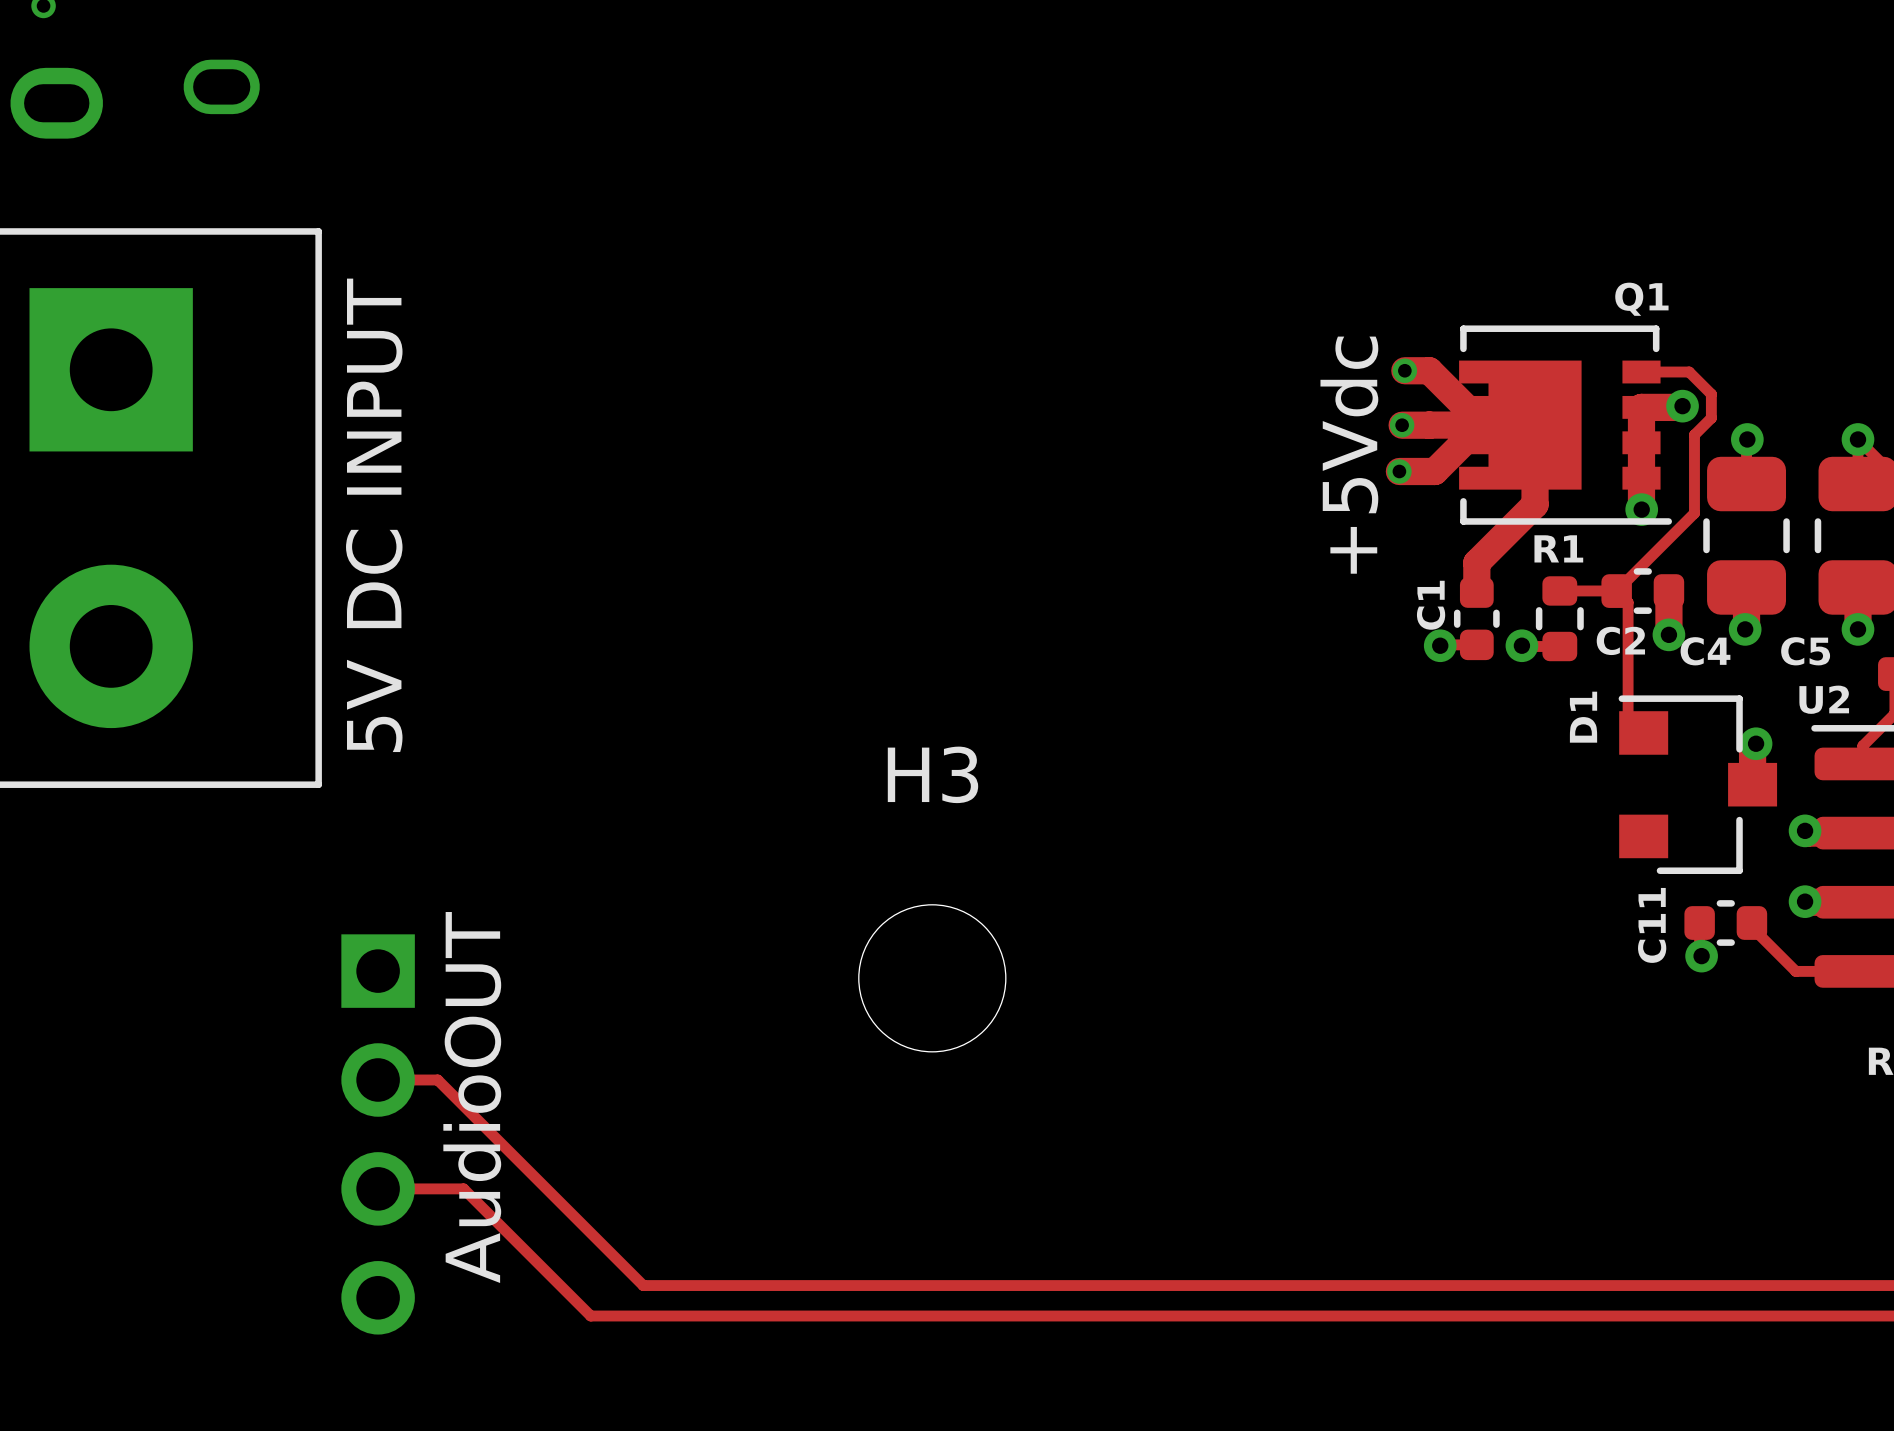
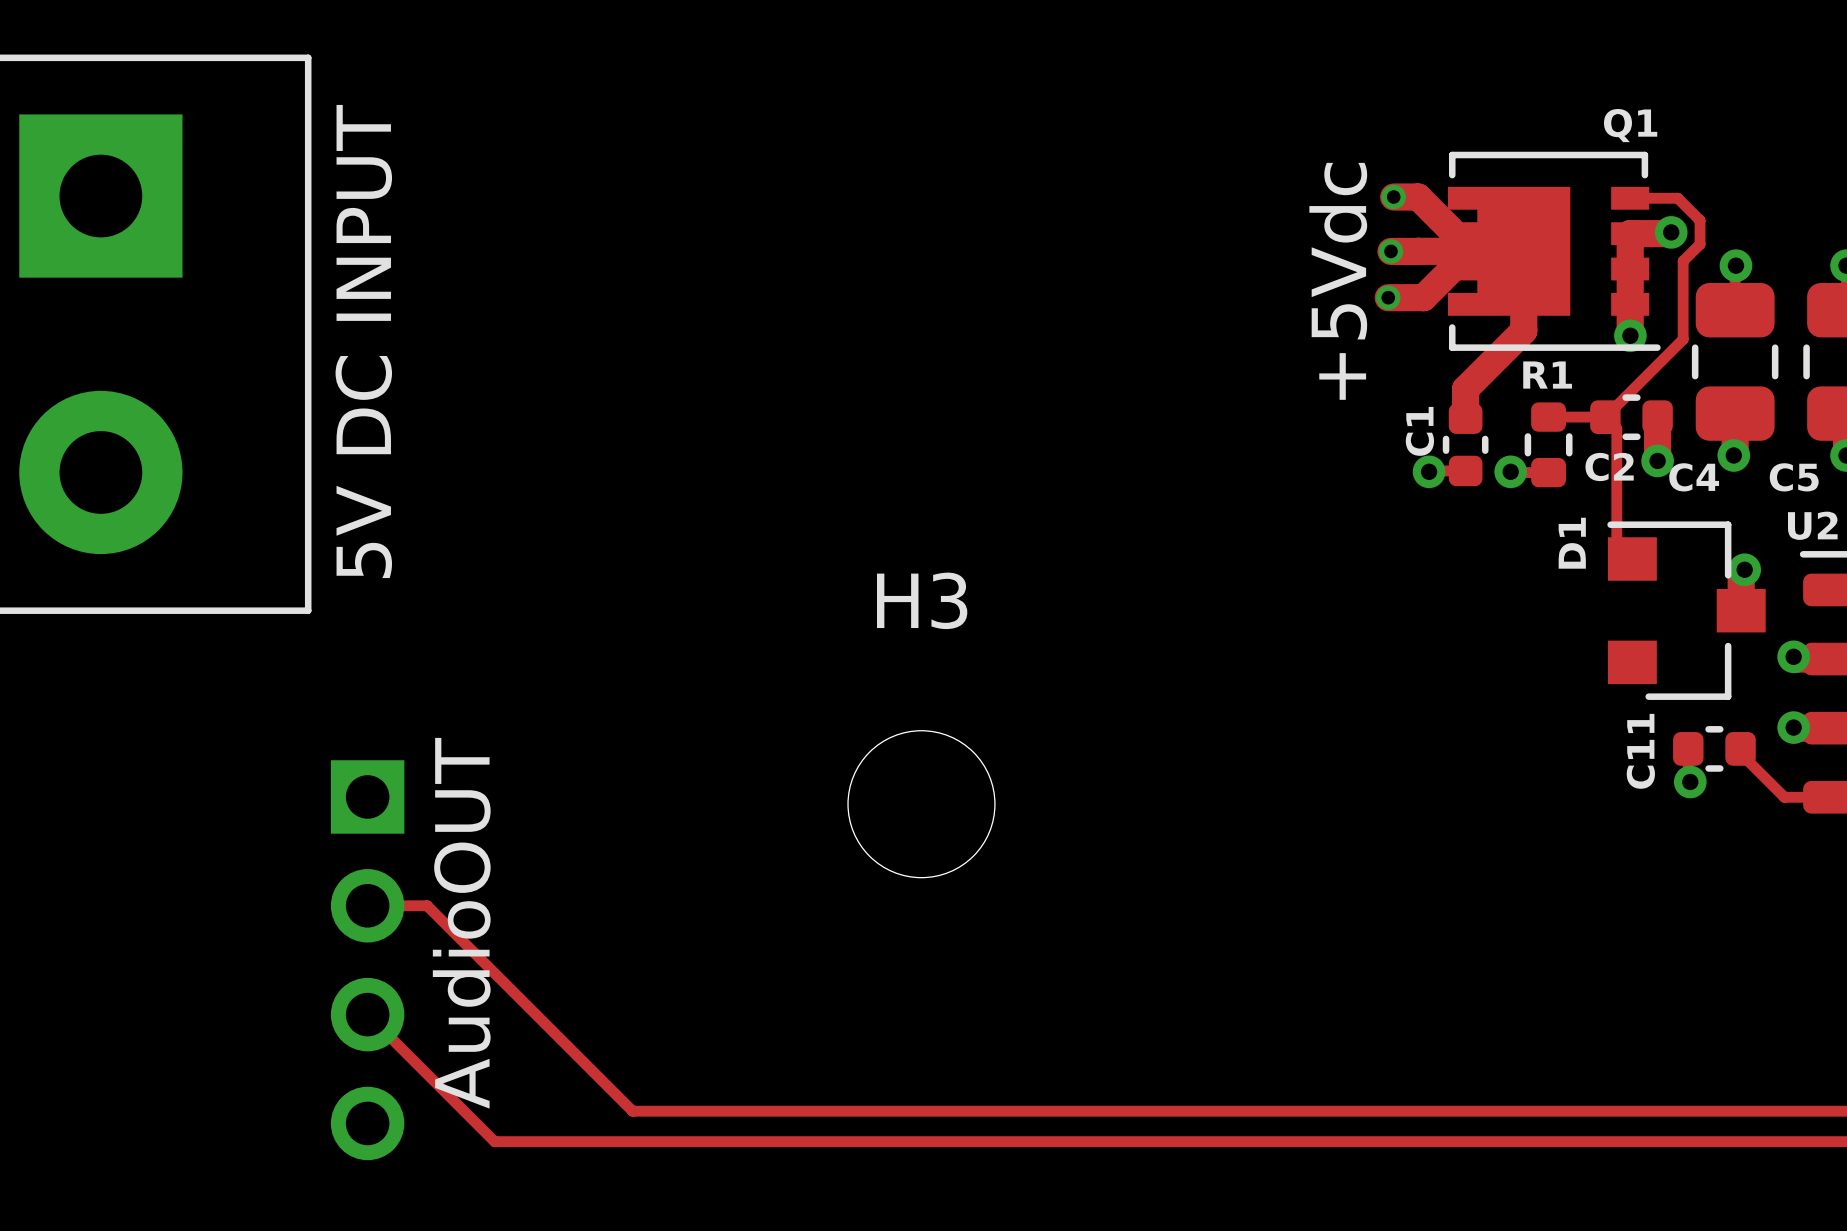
track: (378, 1188) (463, 1188) (590, 1316) -> (367, 1014) (494, 1141) (580, 1141)

